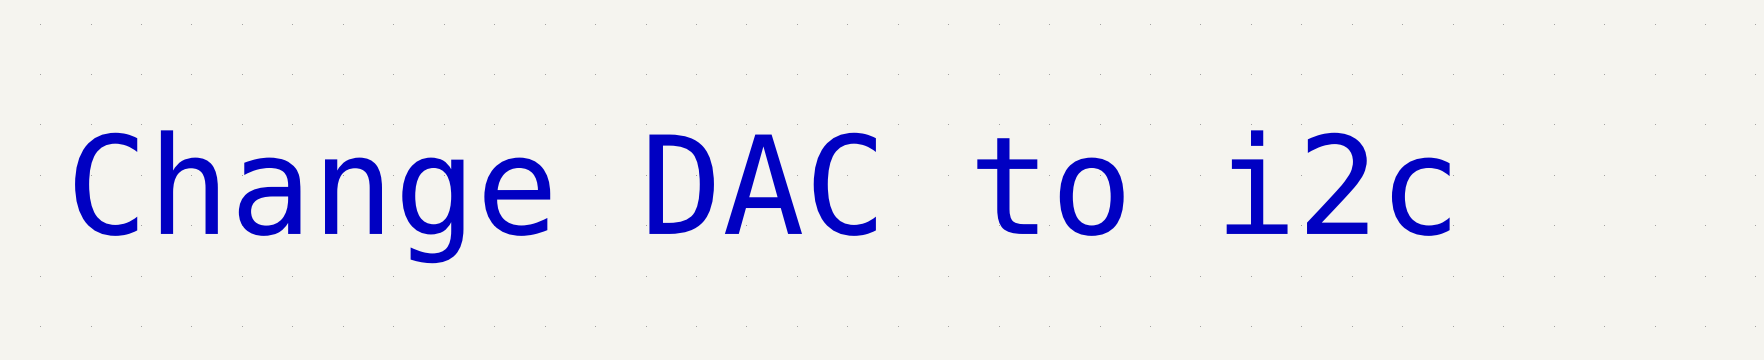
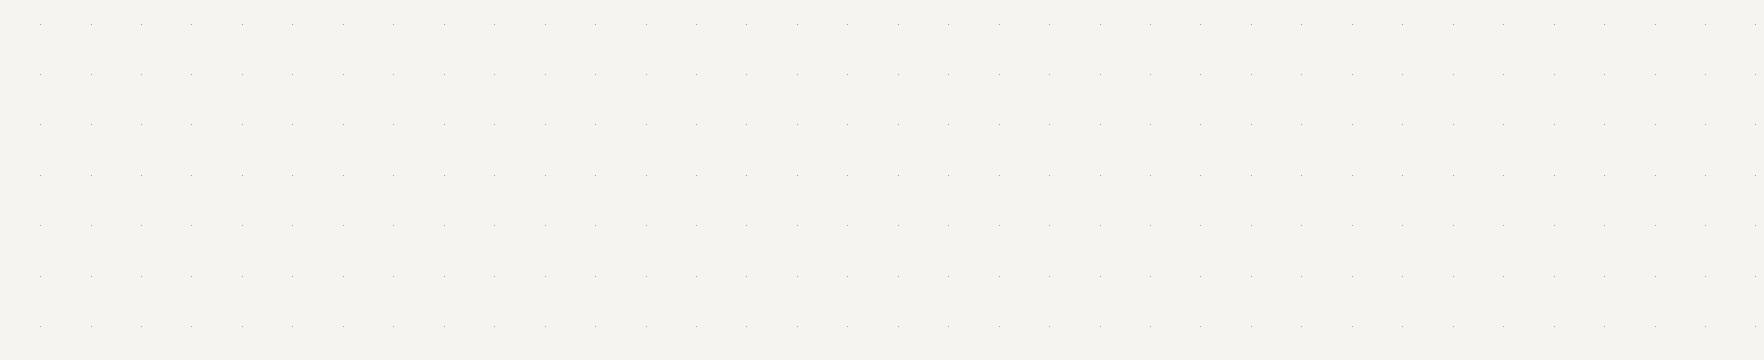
text: Change DAC to i2c (762, 196) -> none

